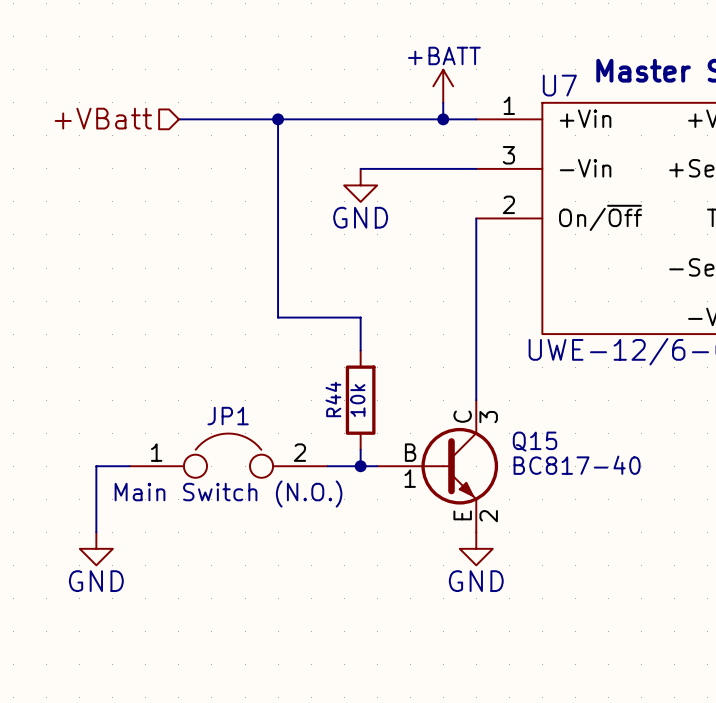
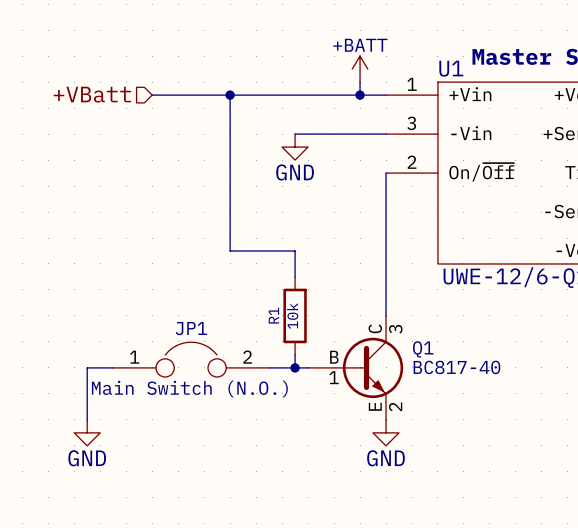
U7 name: U7 (559, 85) -> U1 (451, 68)
R44 name: R44 (333, 399) -> R1 (273, 315)
Q15 name: Q15 (535, 441) -> Q1 (423, 349)

